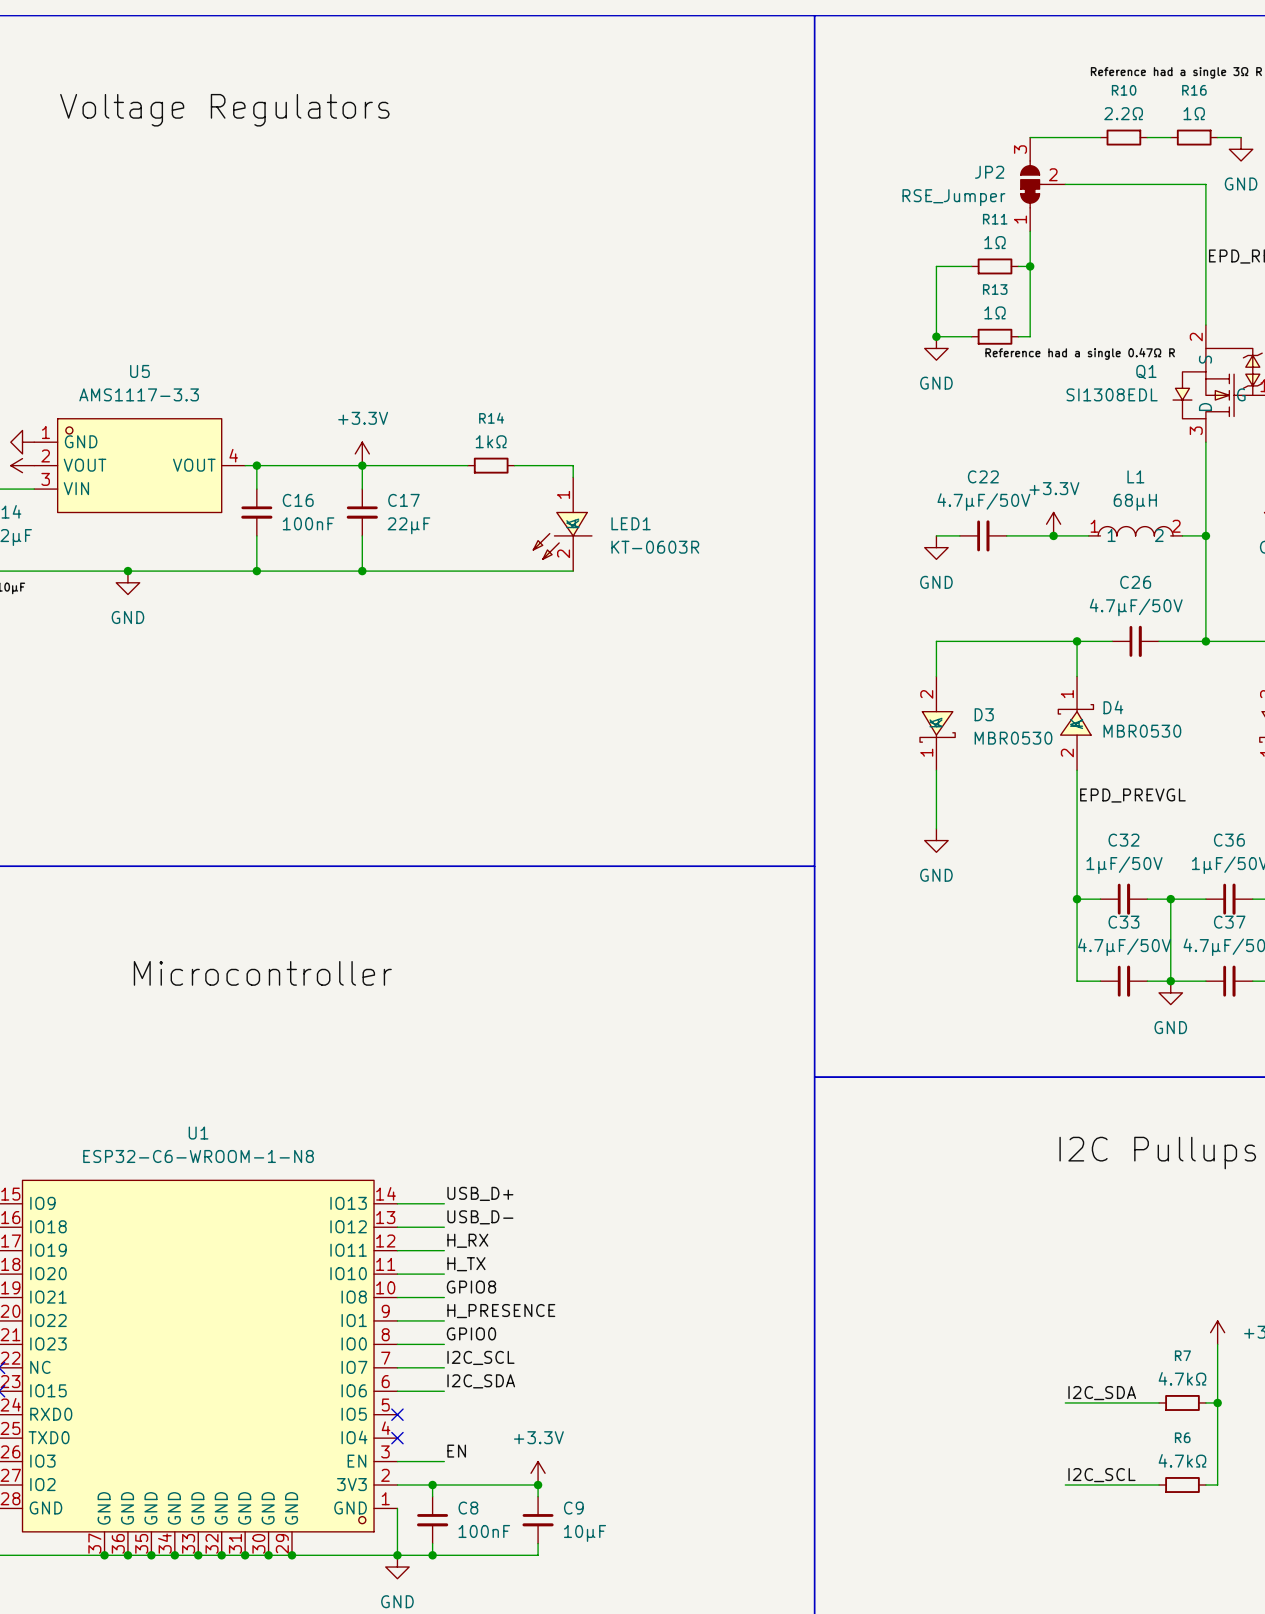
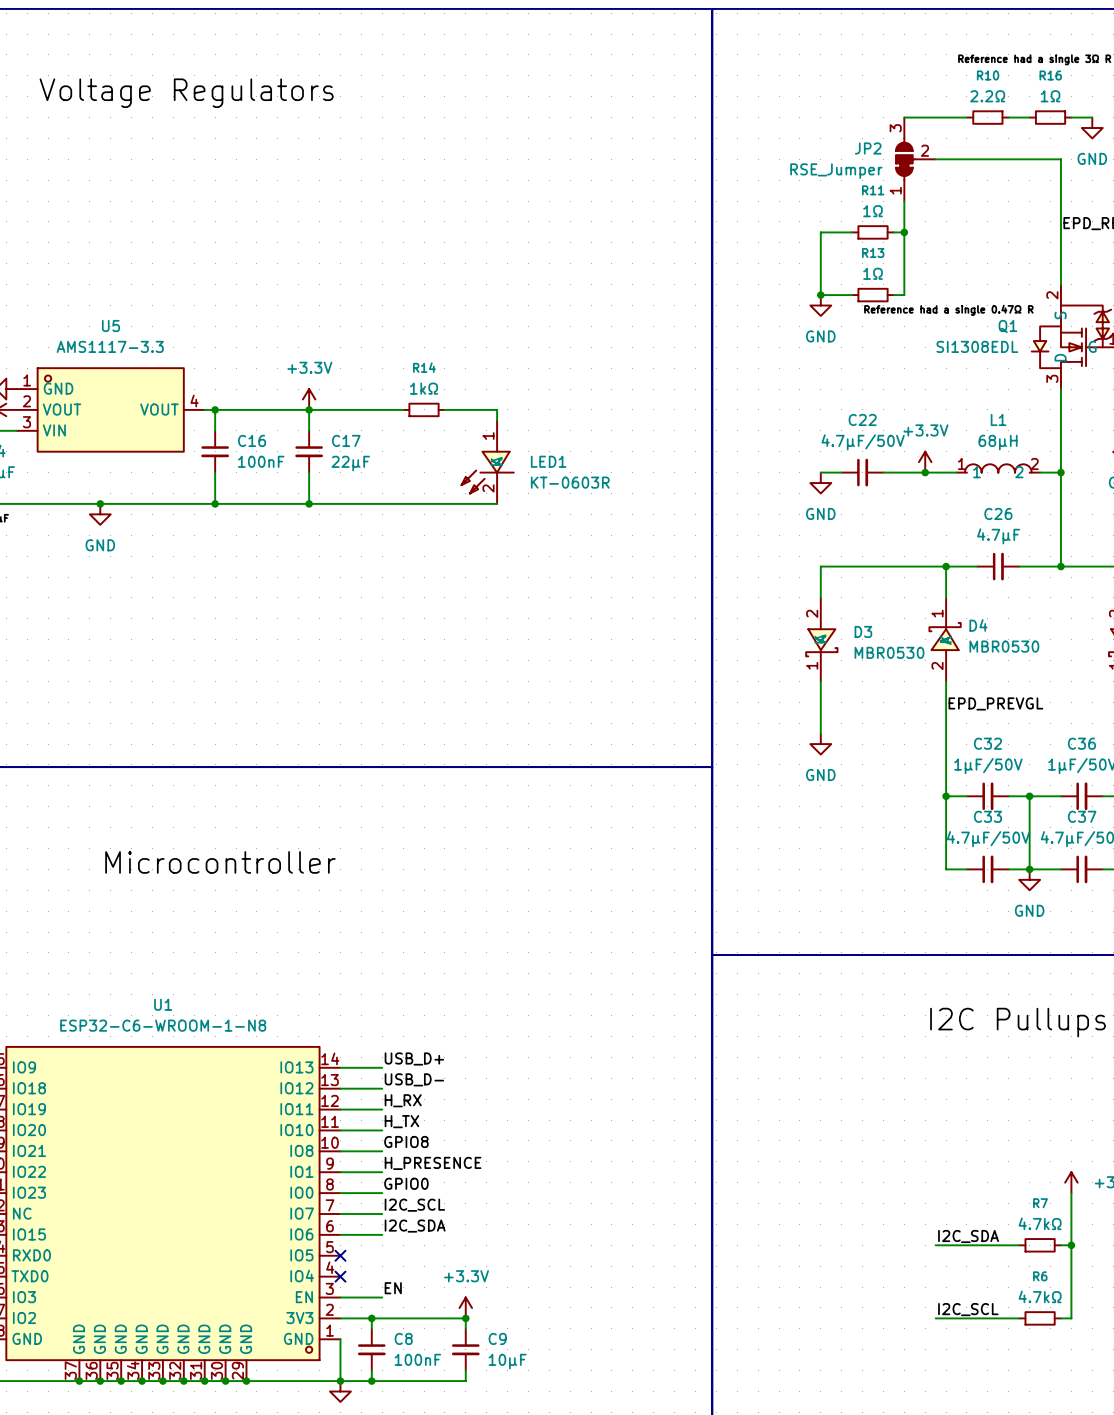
C26 value: 4.7μF/50V (1136, 607) -> 4.7μF (998, 536)

